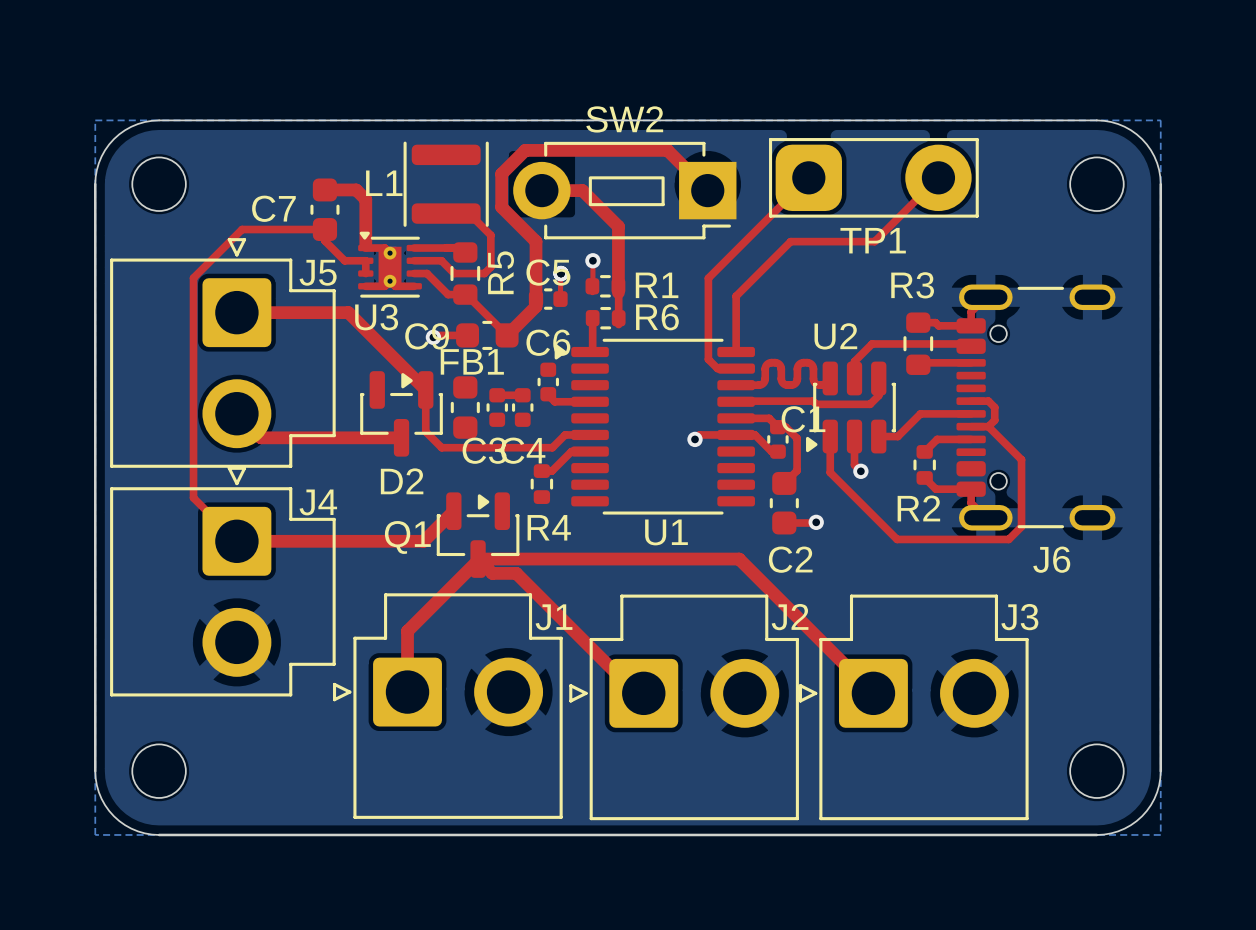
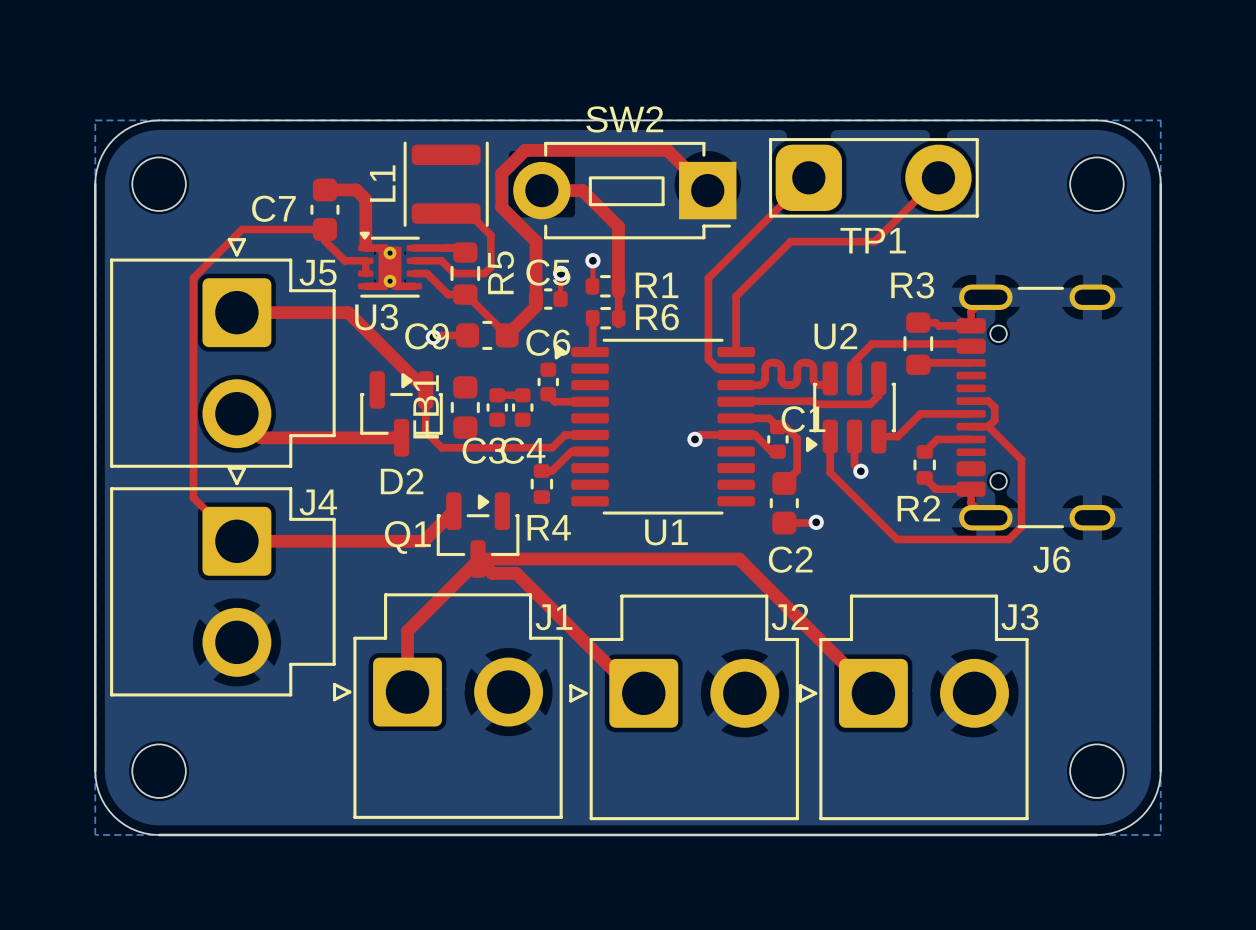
L1 name rotation: 0° (384, 183) -> 90° counterclockwise (382, 183)
FB1 name rotation: 0° (472, 361) -> 90° counterclockwise (426, 406)

